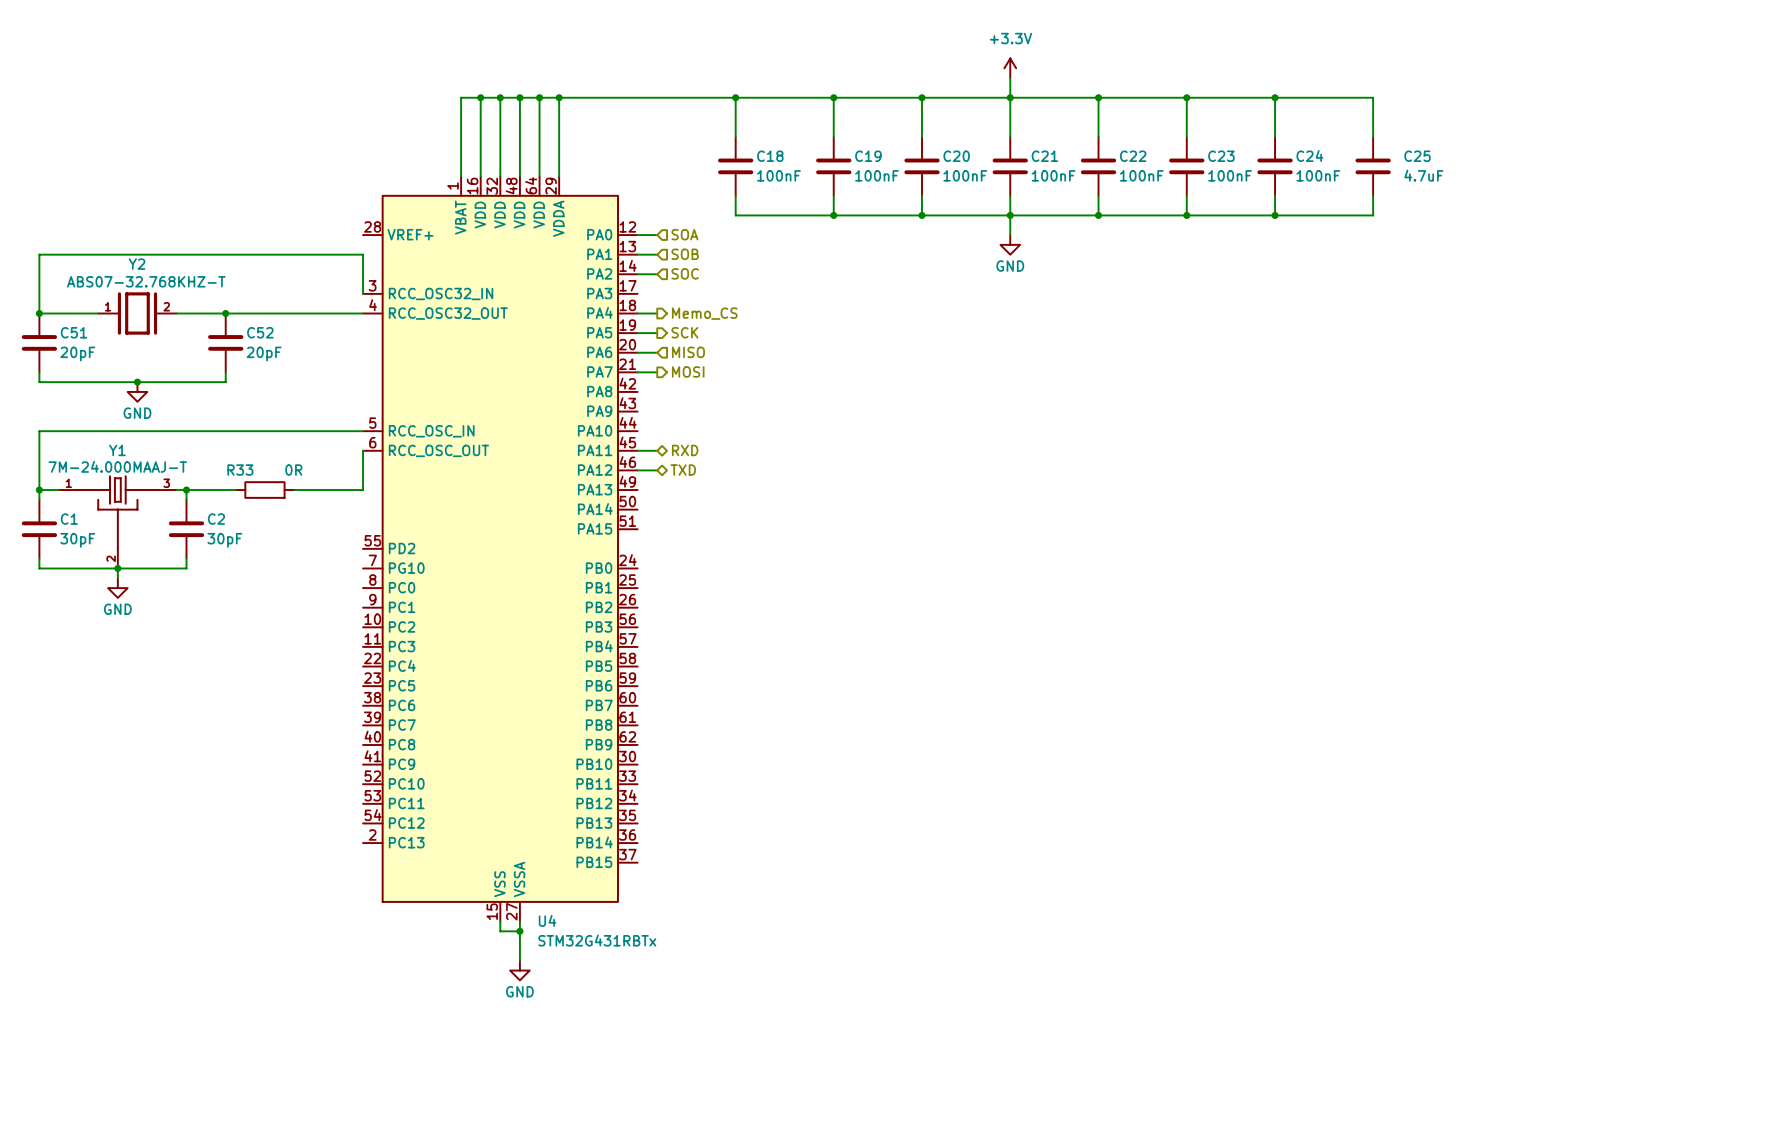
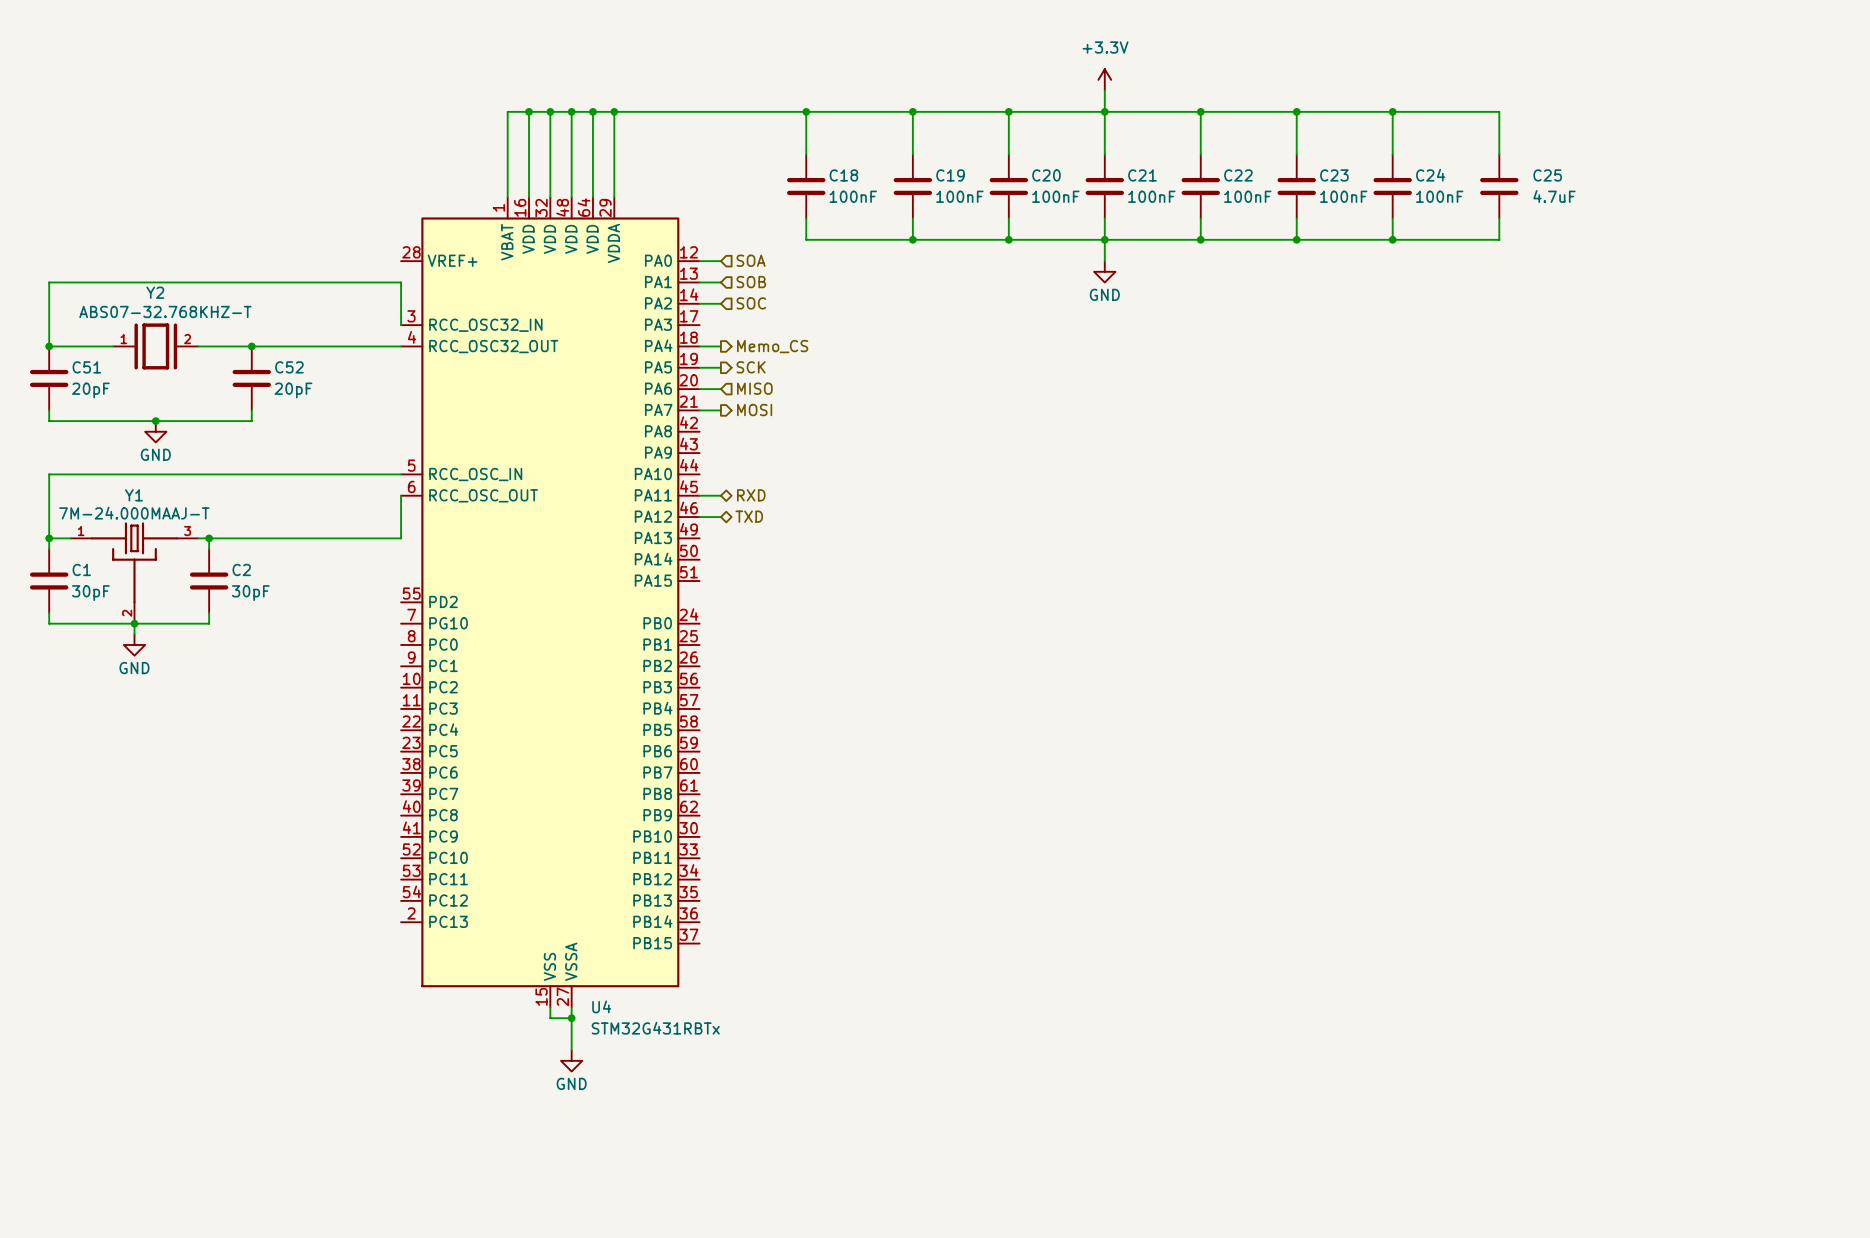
wire: none -> (262, 538) (326, 538)
R33: 0R (264, 490) -> none

